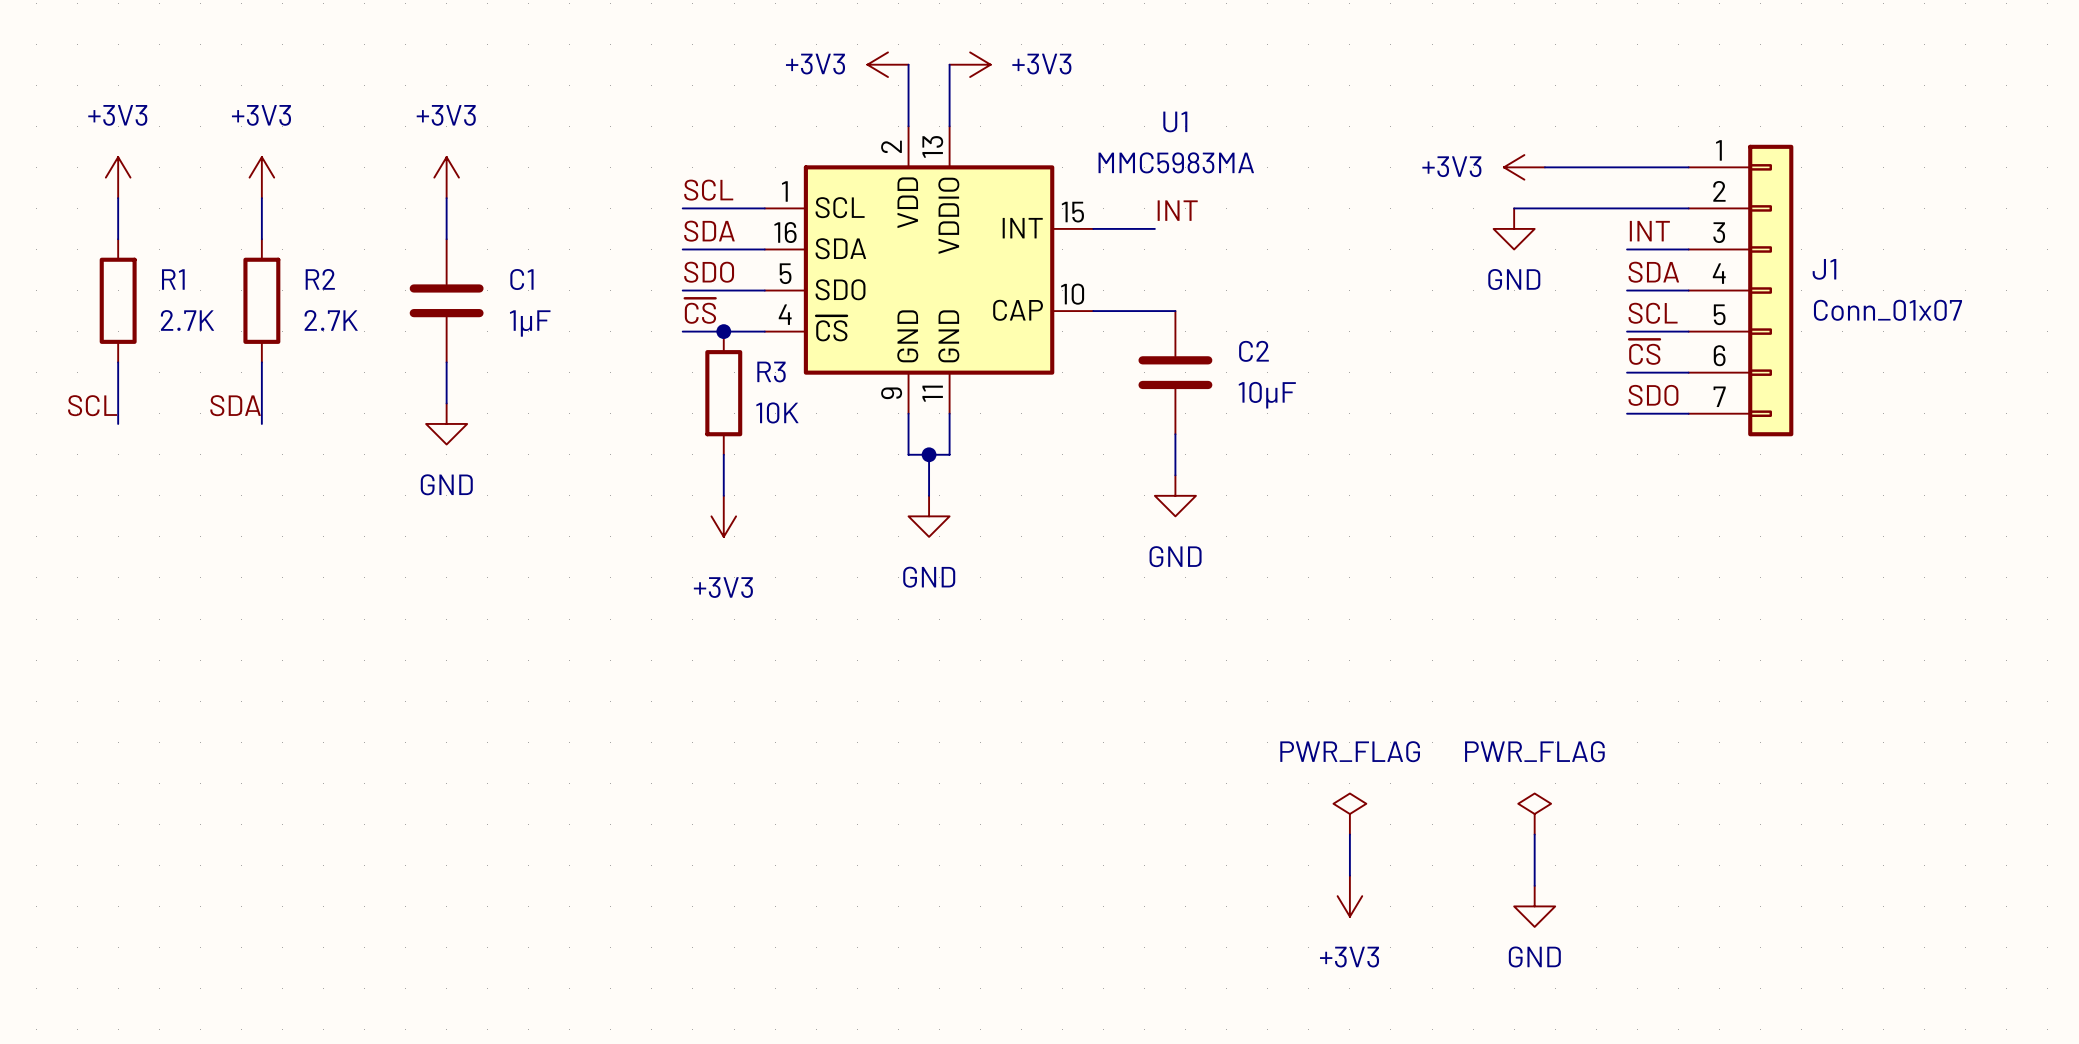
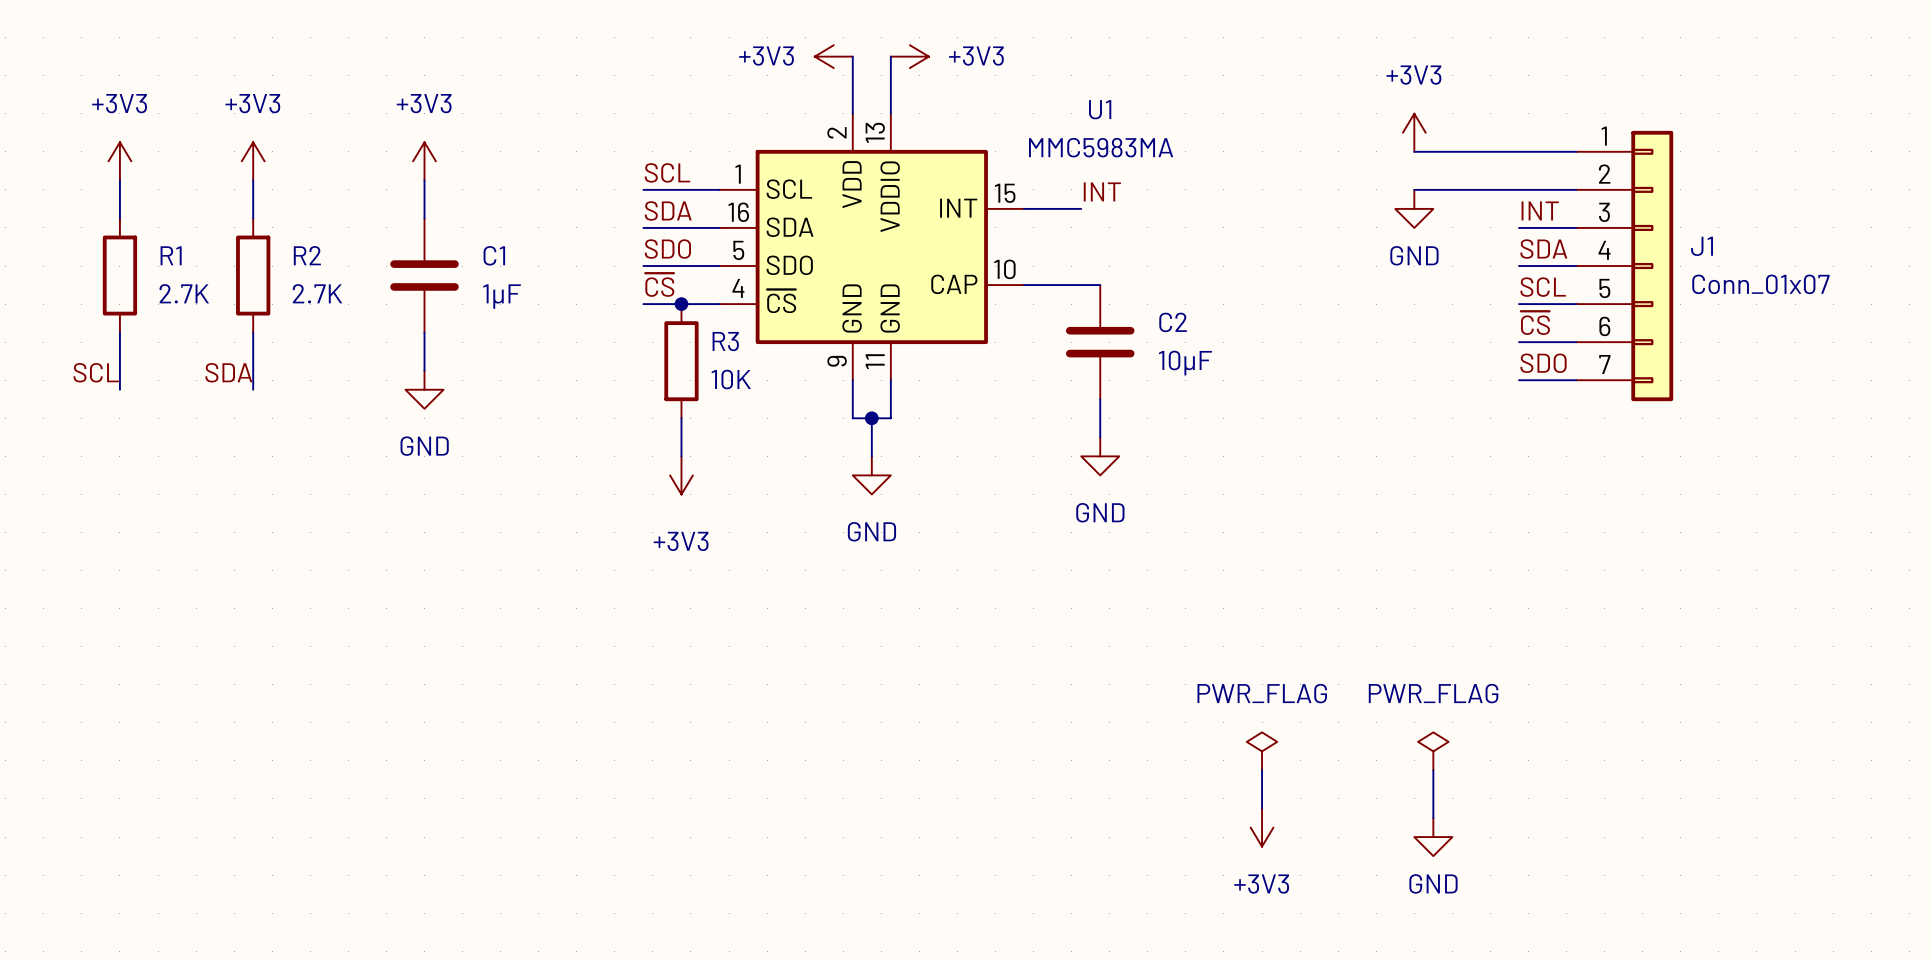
power symbol rotation: 0° (1524, 167) -> 90° clockwise (1414, 132)

